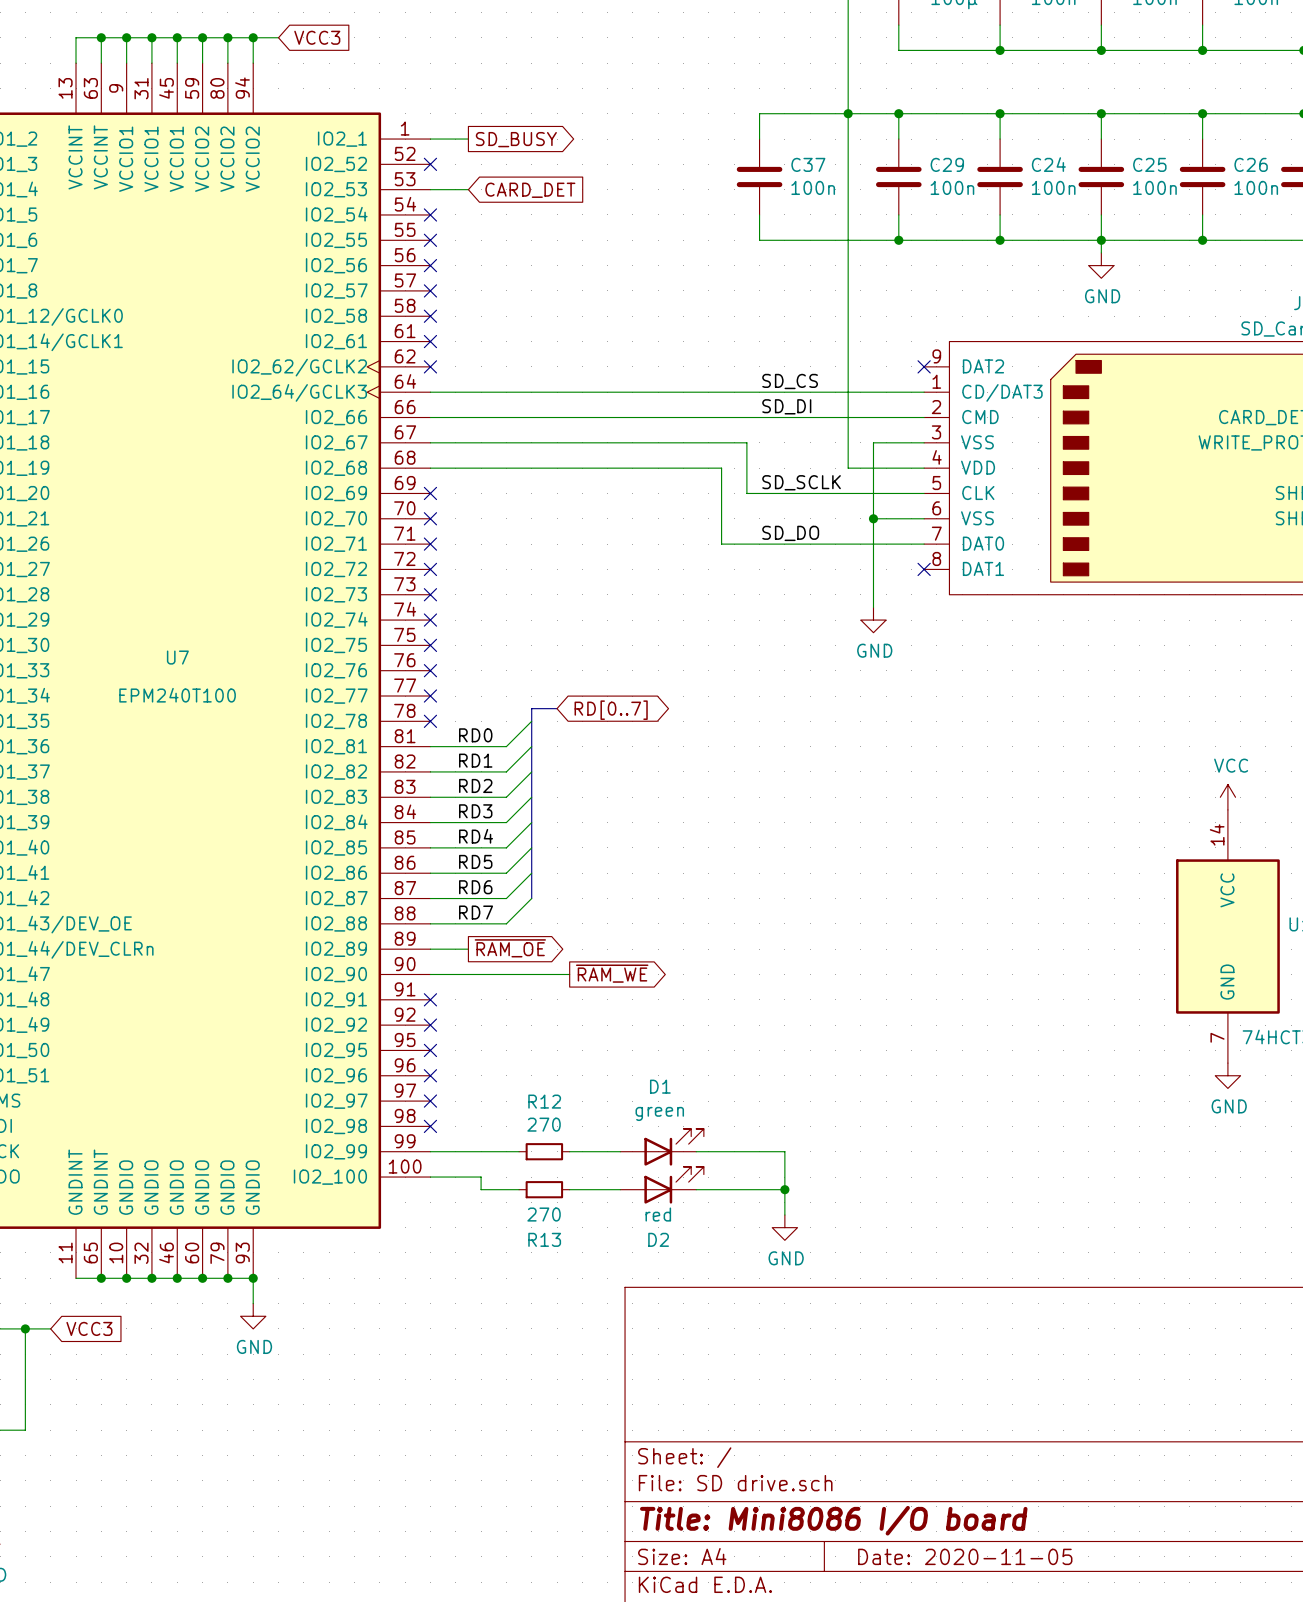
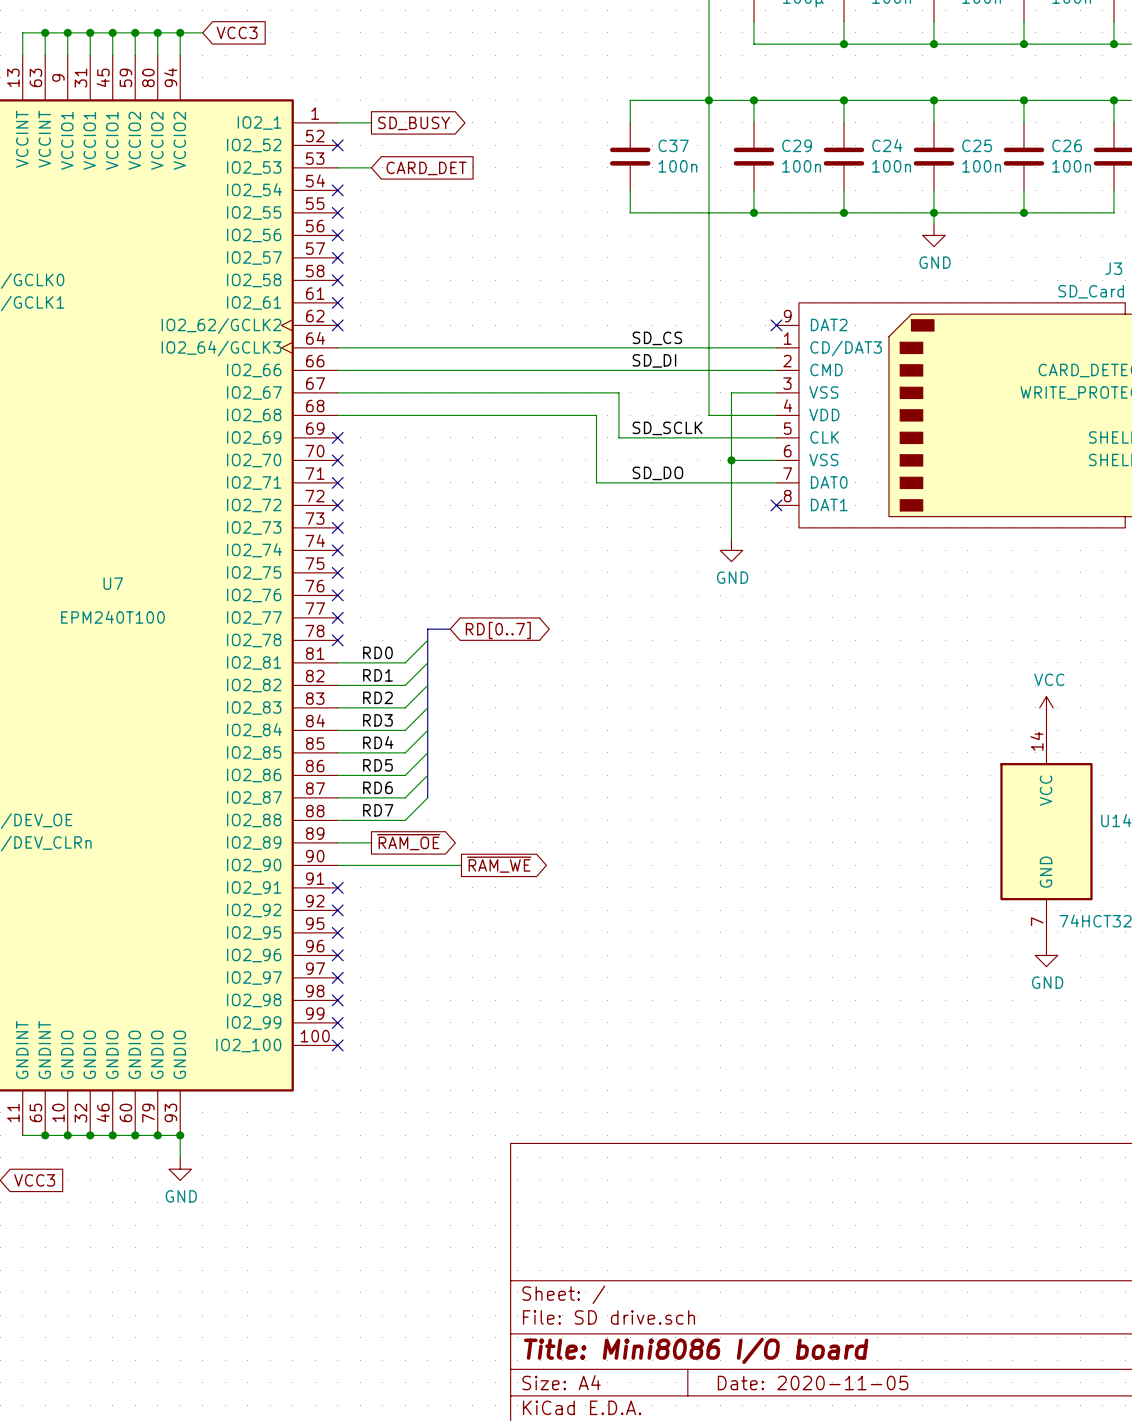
D1: green (662, 1147) -> none
wire: (430, 1151) (519, 1151) -> none
no-connect mark: none -> (337, 1022)
R12: 270 (544, 1151) -> none
wire: (569, 1151) (620, 1151) -> none
wire: (696, 1151) (784, 1151) (784, 1215) -> none
wire: (430, 1177) (481, 1177) (481, 1189) (519, 1189) -> none
no-connect mark: none -> (337, 1045)
D2: red (662, 1185) -> none
R13: 270 (544, 1189) -> none
wire: (569, 1189) (620, 1189) -> none
wire: (696, 1189) (784, 1189) -> none
junction: (784, 1189) -> none
power symbol: GND (784, 1227) -> none

